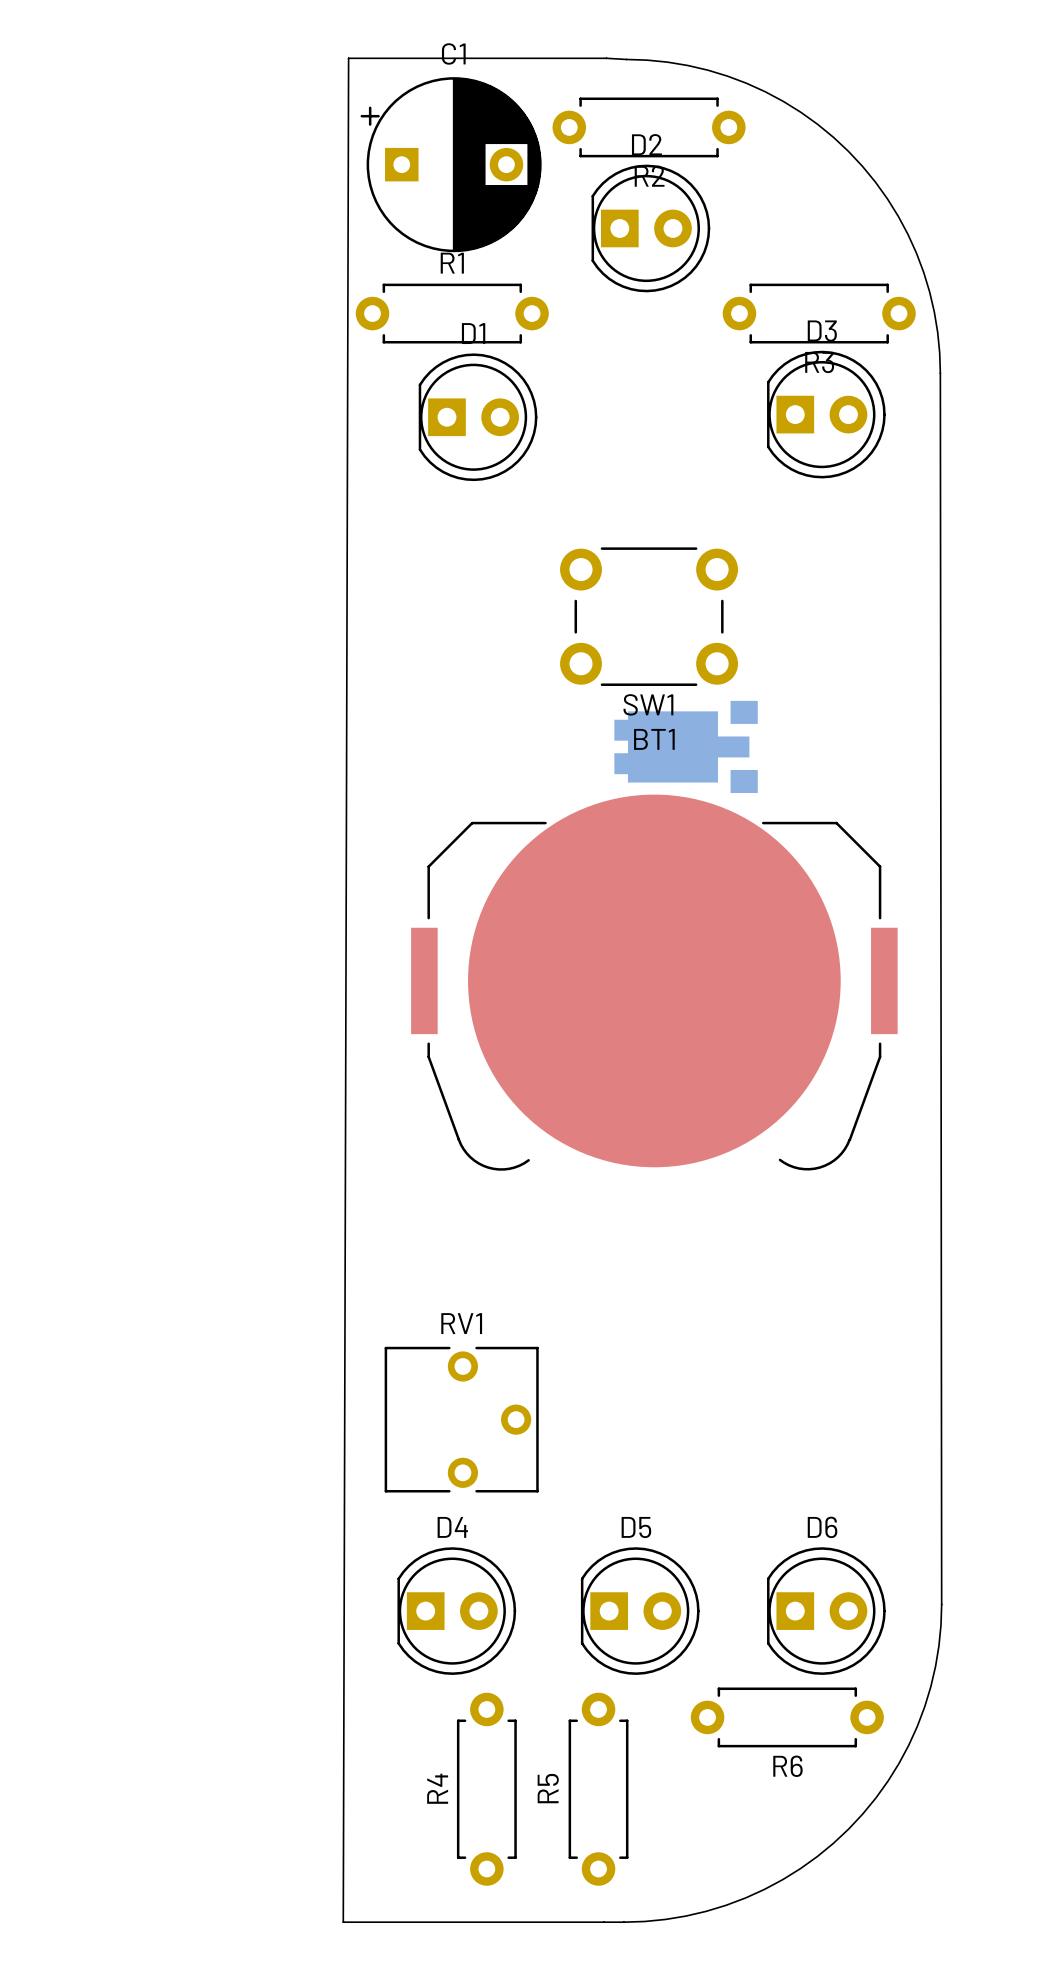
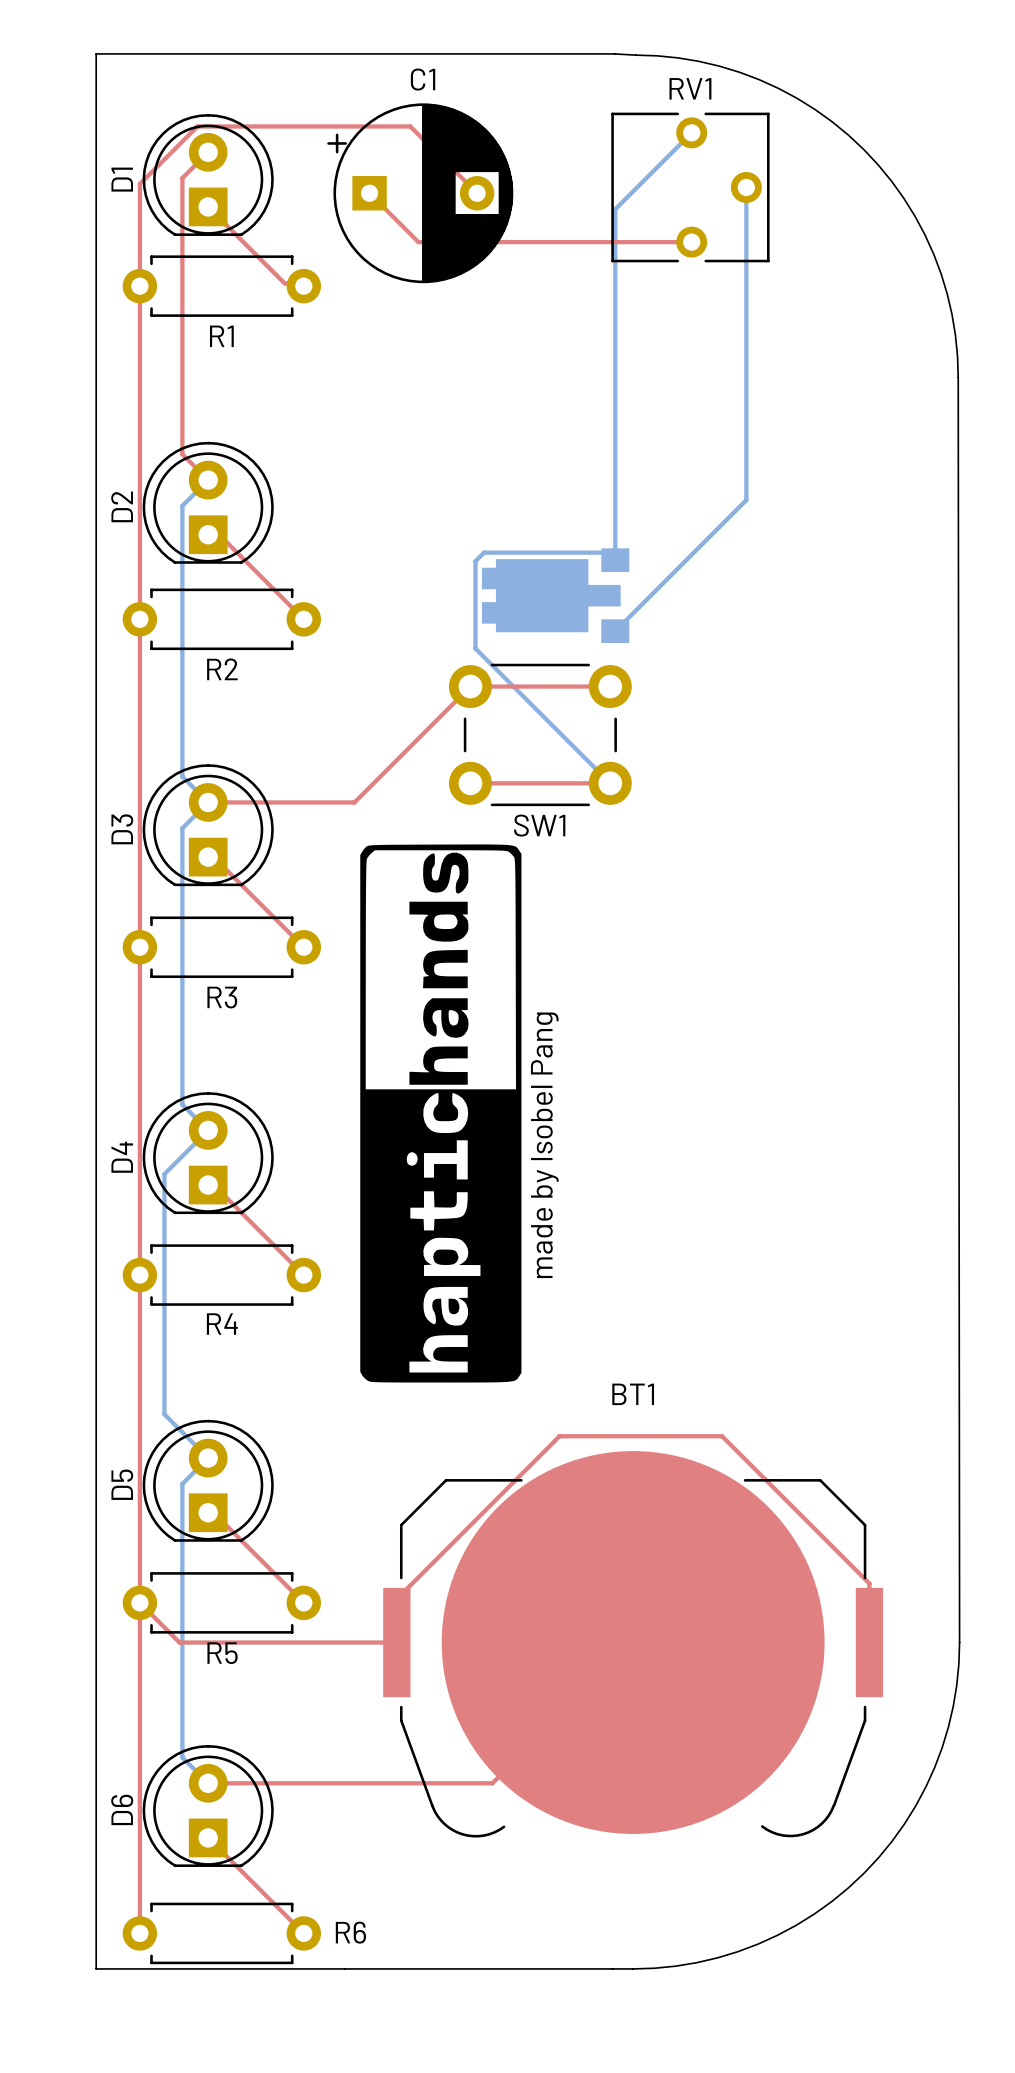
board edge: (348, 58) (343, 1922) -> (350, 53) (96, 53) (96, 1968) (344, 1968)
R2 position: (649, 127) -> (221, 619)
bottom track: none -> (691, 132) (615, 209) (615, 560) (607, 552) (484, 552) (475, 561) (475, 648) (610, 783)
top track: none -> (208, 152) (182, 178) (182, 454) (208, 480)
C1 position: (451, 164) -> (420, 193)
bottom track: none -> (746, 187) (746, 500) (615, 631)
top track: none -> (369, 193) (418, 242) (691, 242)
top track: none -> (477, 193) (410, 126) (197, 126) (139, 184) (139, 1933)
top track: none -> (208, 206) (284, 283) (301, 283) (303, 286)
D2 rotation: 0° (650, 228) -> 90° counterclockwise (208, 502)
D2 position: (650, 228) -> (208, 502)
R1 name position: R1 (452, 263) -> R1 (221, 336)
R1 position: (452, 313) -> (221, 286)
R3 position: (819, 313) -> (221, 947)
D3 rotation: 0° (826, 414) -> 90° counterclockwise (208, 825)
D3 position: (826, 414) -> (208, 825)
D1 rotation: 0° (478, 417) -> 90° counterclockwise (208, 174)
D1 position: (478, 417) -> (208, 174)
bottom track: none -> (208, 480) (182, 505) (182, 776) (208, 802) (182, 828) (182, 1104) (208, 1130) (164, 1174) (164, 1414) (208, 1458) (182, 1483) (182, 1757) (208, 1783)
top track: none -> (208, 534) (219, 534) (303, 619)
SW1 position: (649, 616) -> (540, 734)
top track: none -> (610, 686) (470, 686) (354, 802) (208, 802)
part position: (686, 746) -> (555, 595)
top track: none -> (470, 783) (610, 783)
drawing: none -> [360, 844, 522, 1383]
top track: none -> (208, 857) (213, 857) (303, 947)
BT1 position: (654, 982) -> (633, 1644)
text: none -> made by Isobel Pang (544, 1145)
top track: none -> (208, 1185) (213, 1185) (303, 1275)
RV1 position: (461, 1419) -> (690, 187)
top track: none -> (208, 1512) (213, 1512) (303, 1602)
top track: none -> (139, 1602) (179, 1642) (396, 1642) (396, 1598) (559, 1436) (722, 1436) (869, 1583) (869, 1642)
top track: none -> (633, 1642) (492, 1783) (208, 1783)
D4 rotation: 0° (456, 1611) -> 90° counterclockwise (208, 1153)
D4 position: (456, 1611) -> (208, 1153)
D5 rotation: 0° (640, 1611) -> 90° counterclockwise (208, 1480)
D5 position: (640, 1611) -> (208, 1480)
D6 rotation: 0° (826, 1611) -> 90° counterclockwise (208, 1805)
D6 position: (826, 1611) -> (208, 1805)
R6 position: (787, 1717) -> (221, 1933)
R6 name position: R6 (787, 1766) -> R6 (350, 1932)
R4 name position: R4 (437, 1788) -> R4 (222, 1324)
R5 name position: R5 (548, 1788) -> R5 (222, 1653)
R4 rotation: 0° (486, 1789) -> 90° clockwise (221, 1275)
R4 position: (486, 1789) -> (221, 1275)
R5 rotation: 0° (598, 1789) -> 90° clockwise (221, 1602)
R5 position: (598, 1789) -> (221, 1602)
top track: none -> (208, 1837) (303, 1933)

